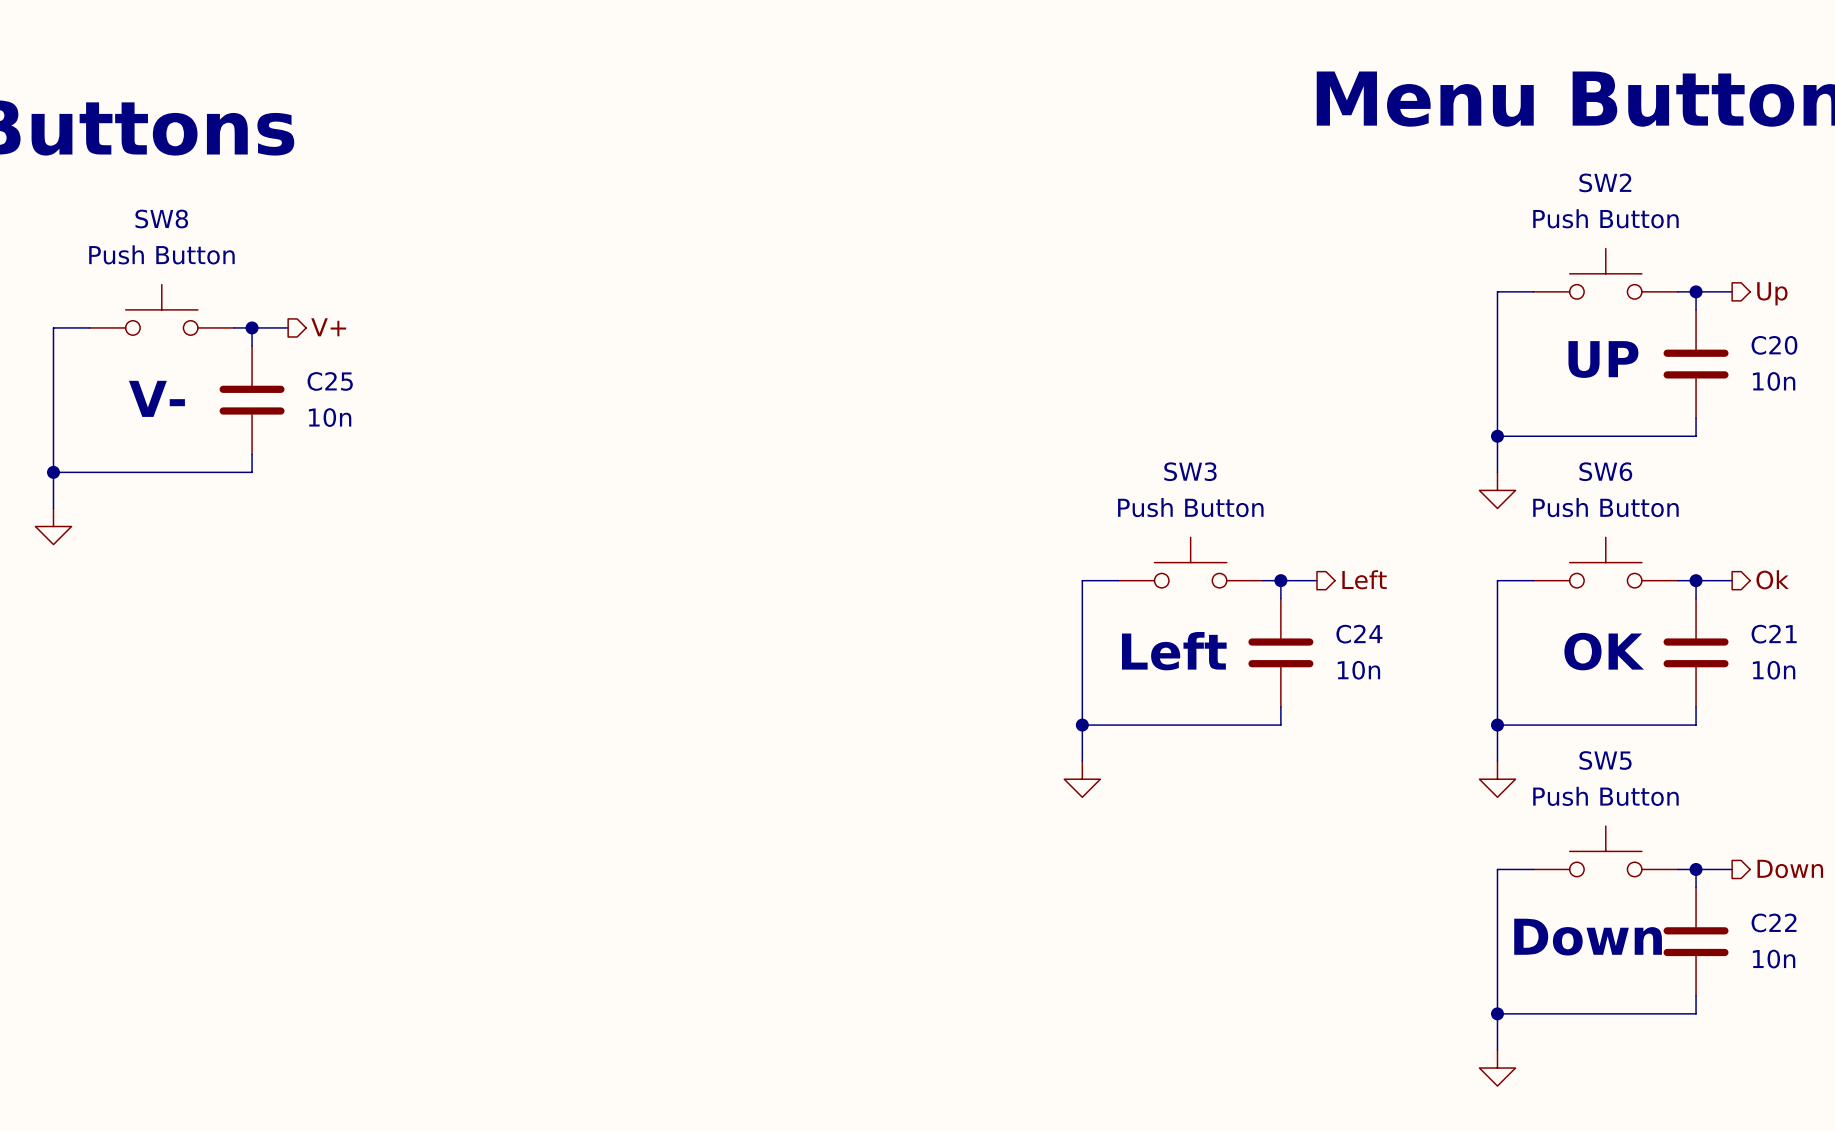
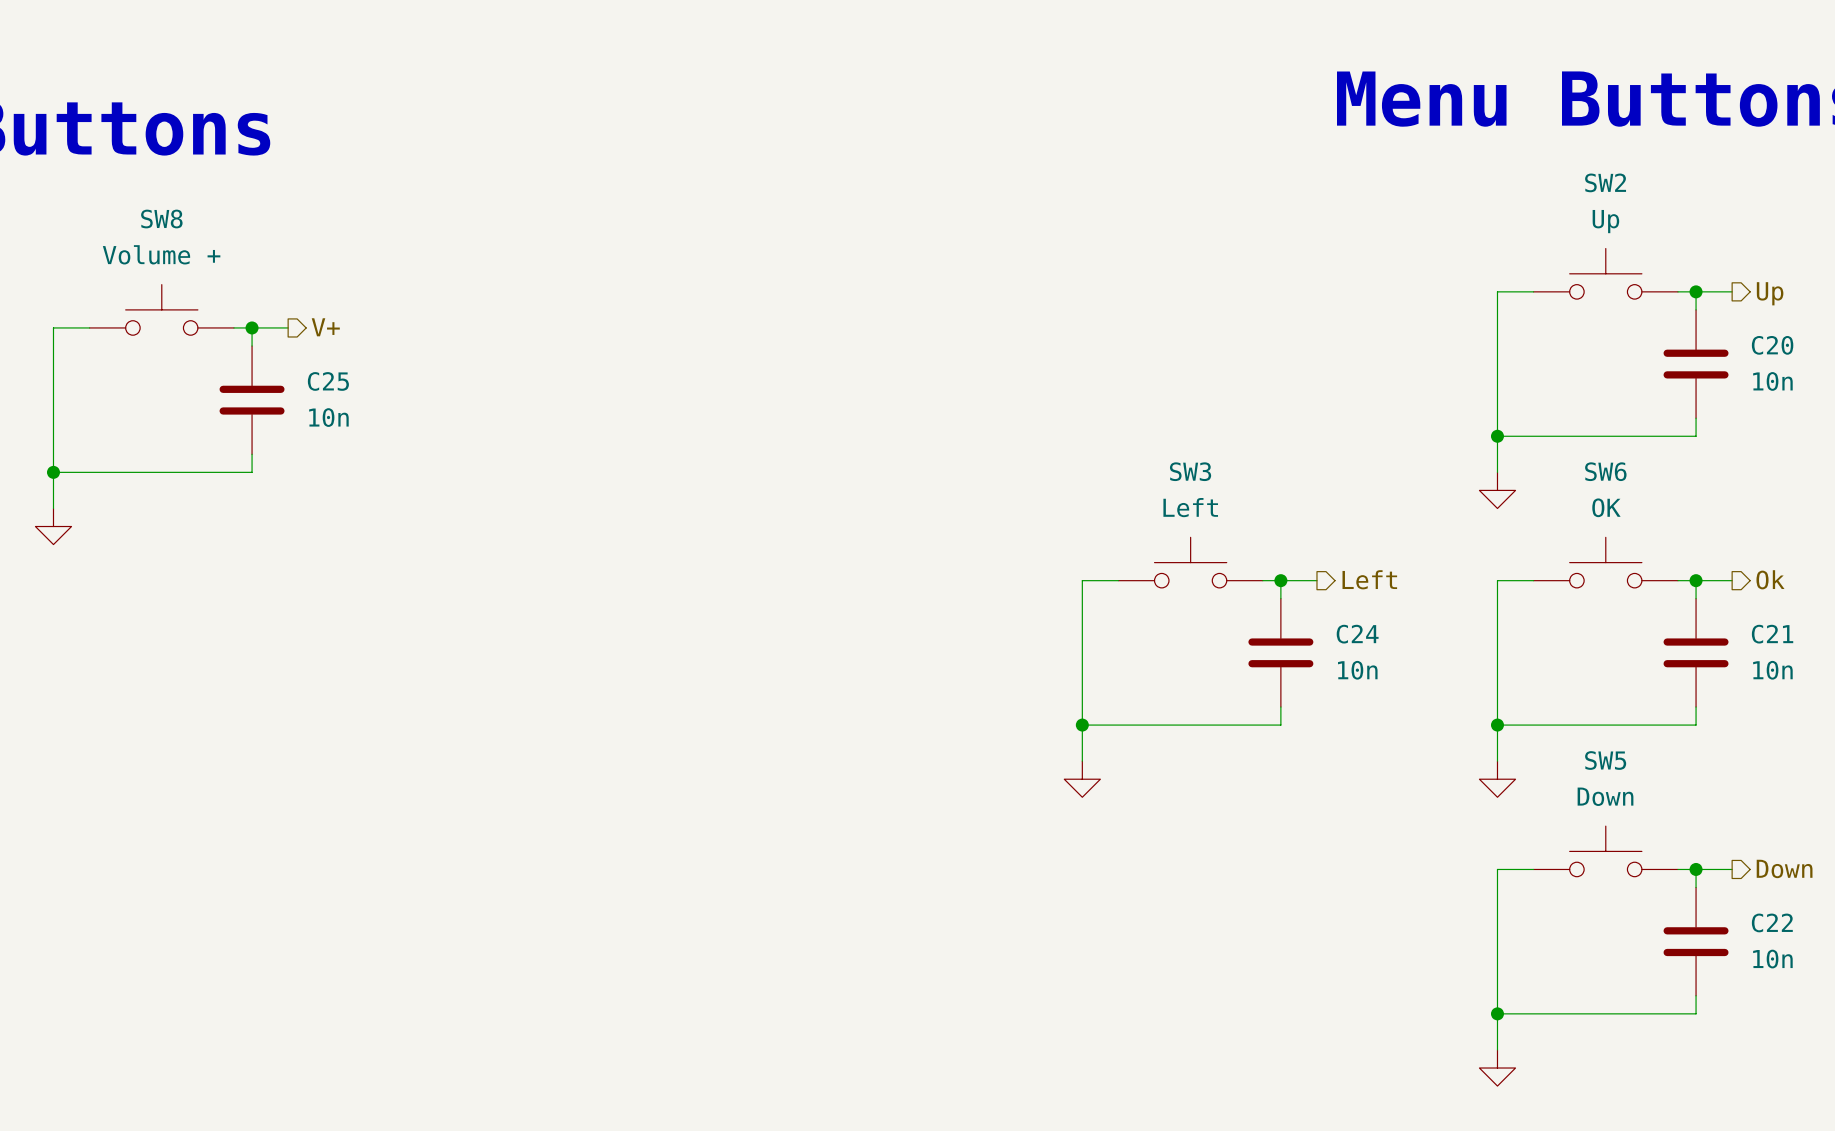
SW2 value: Push Button (1605, 218) -> Up (1605, 221)
SW8 value: Push Button (161, 254) -> Volume + (161, 254)
text: UP (1603, 359) -> none
text: V- (156, 398) -> none
SW3 value: Push Button (1190, 507) -> Left (1190, 507)
SW6 value: Push Button (1605, 507) -> OK (1606, 507)
text: Left (1174, 651) -> none
text: OK (1604, 651) -> none
SW5 value: Push Button (1605, 796) -> Down (1605, 796)
text: Down (1588, 937) -> none

